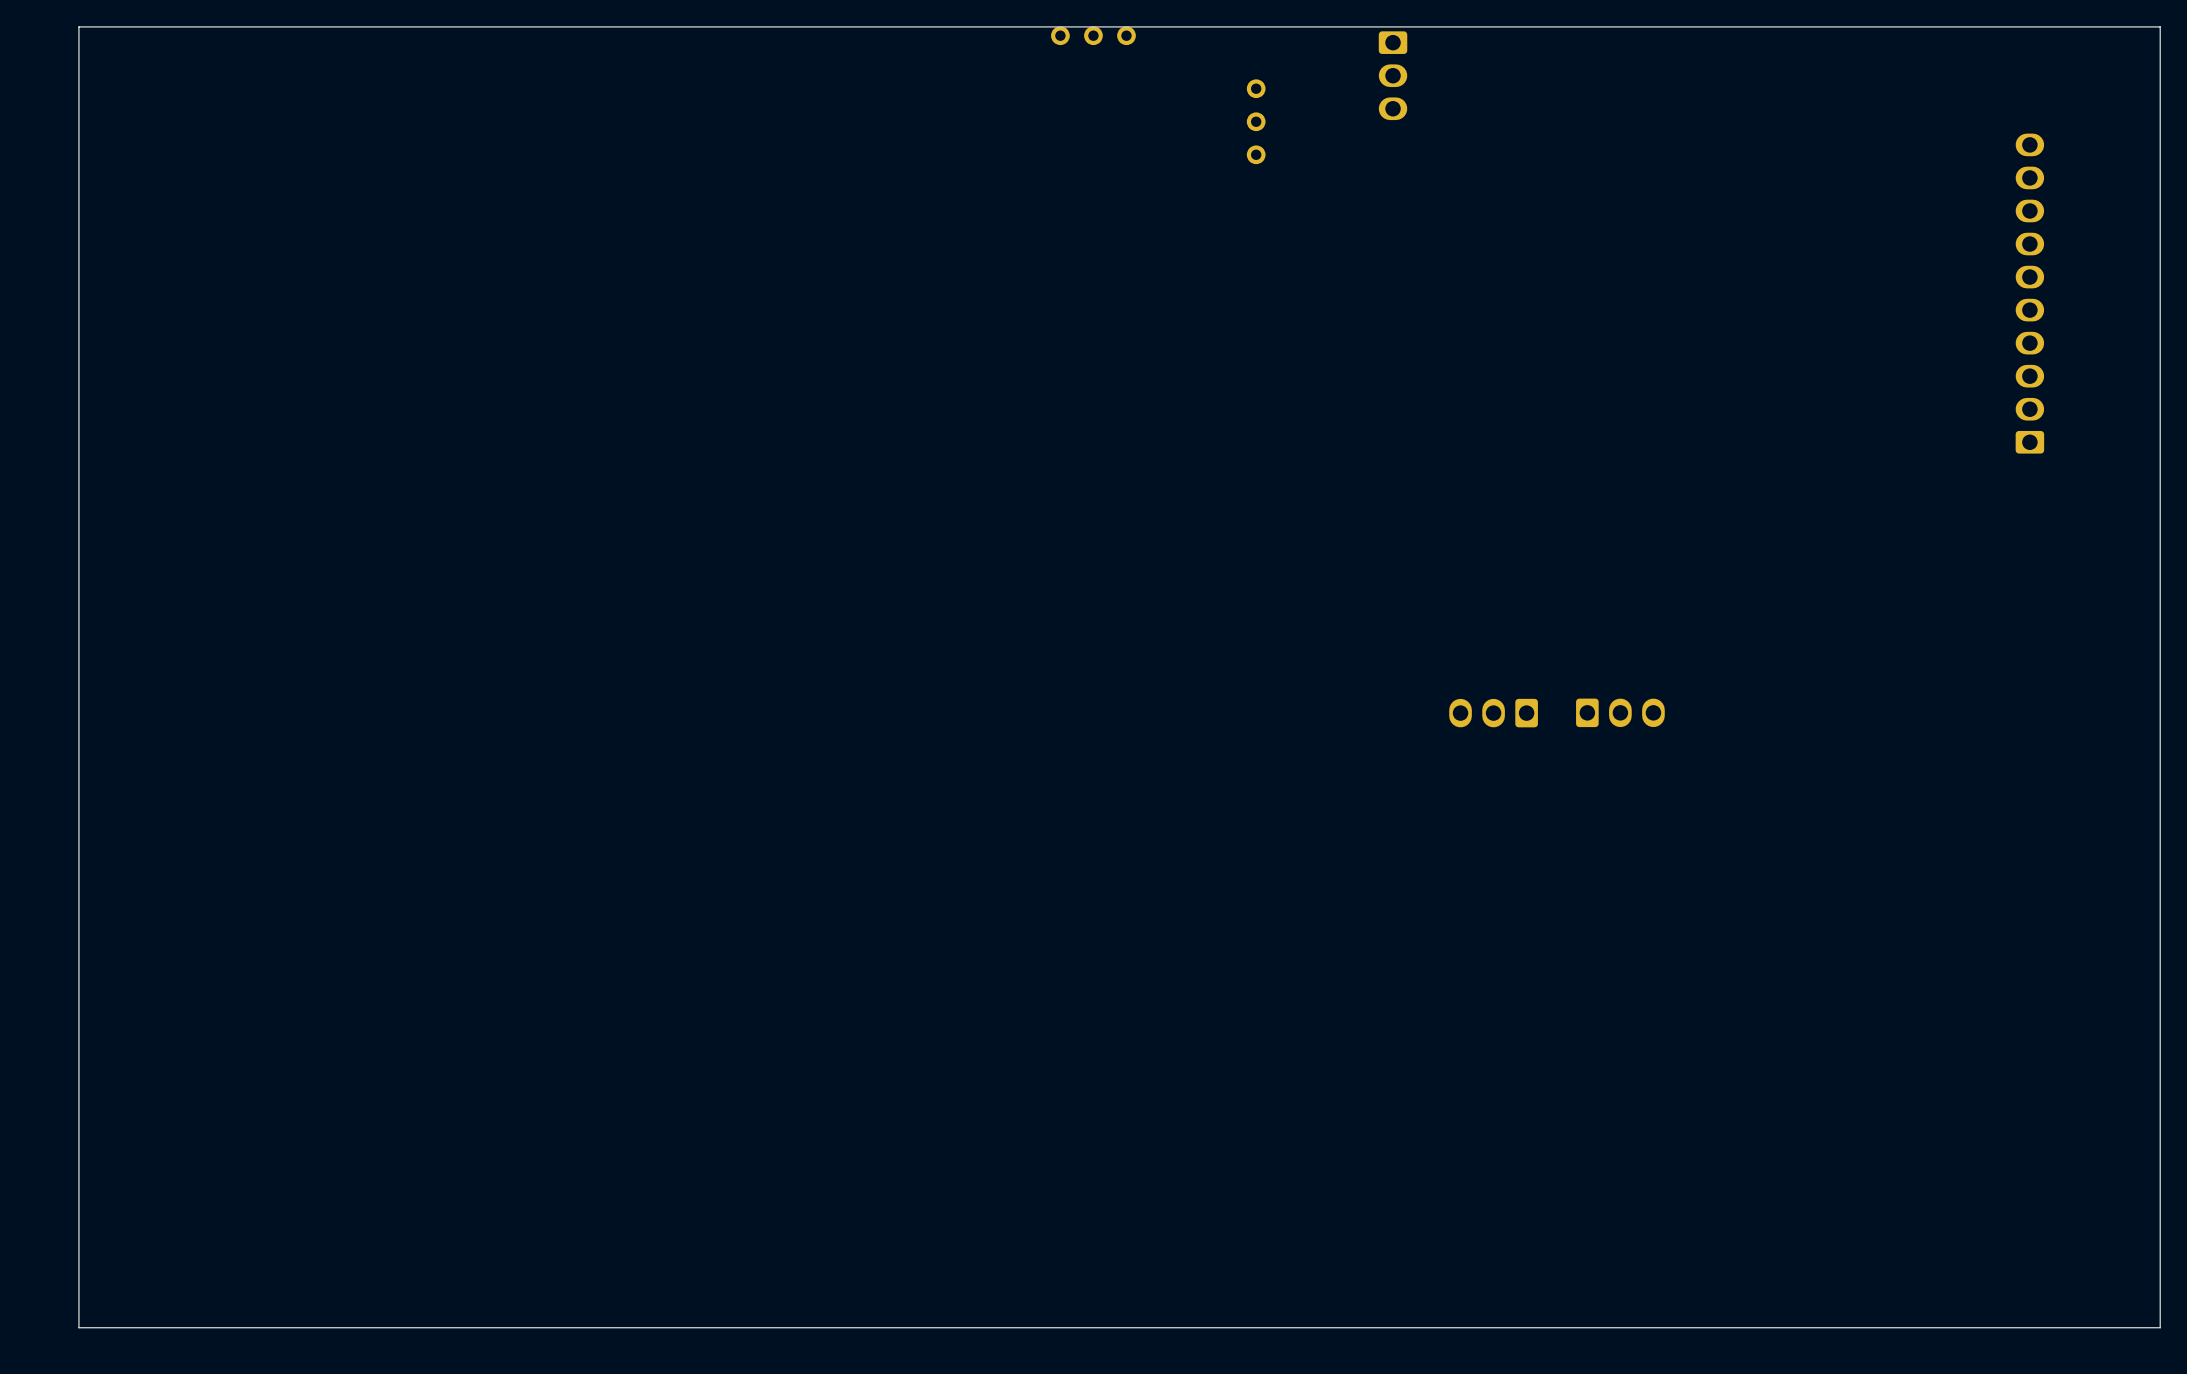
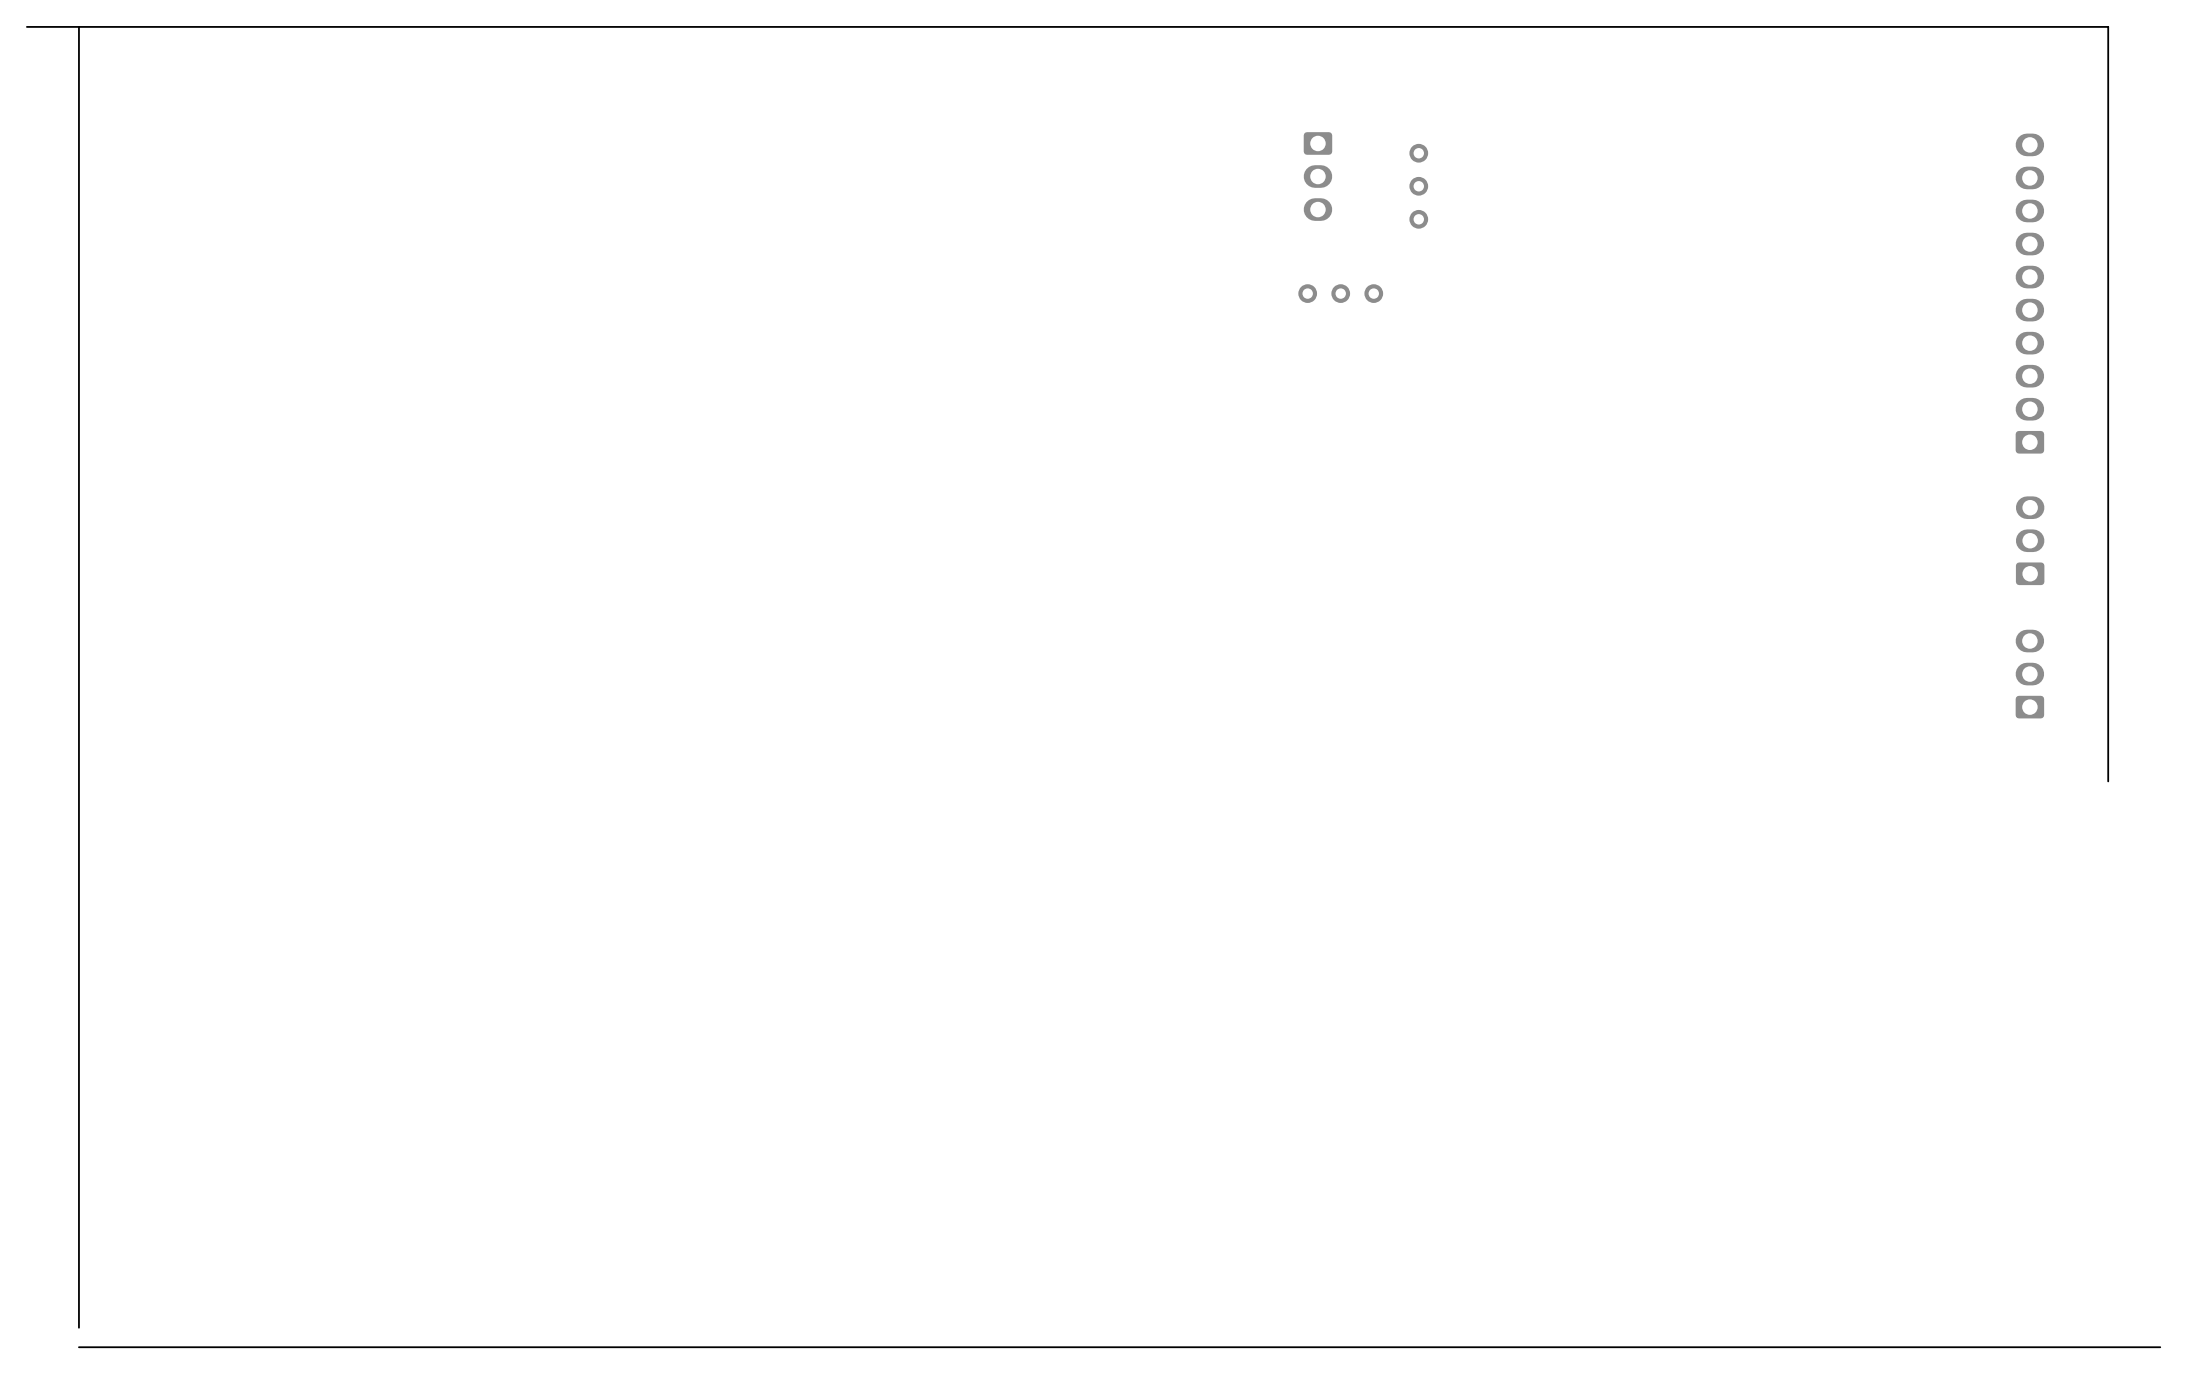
board edge: none -> (78, 26) (26, 26)
board edge: (2108, 26) (2160, 26) (2160, 1327) (78, 1327) -> (2108, 26) (2108, 781)
part: (1093, 35) -> none
part position: (1393, 75) -> (1317, 176)
part: (1256, 121) -> none
part: none -> (1418, 186)
part: none -> (1340, 293)
part: none -> (2030, 540)
part: none -> (2029, 674)
part: (1620, 712) -> none
part: (1493, 713) -> none
board edge: none -> (2160, 1347) (78, 1347)

